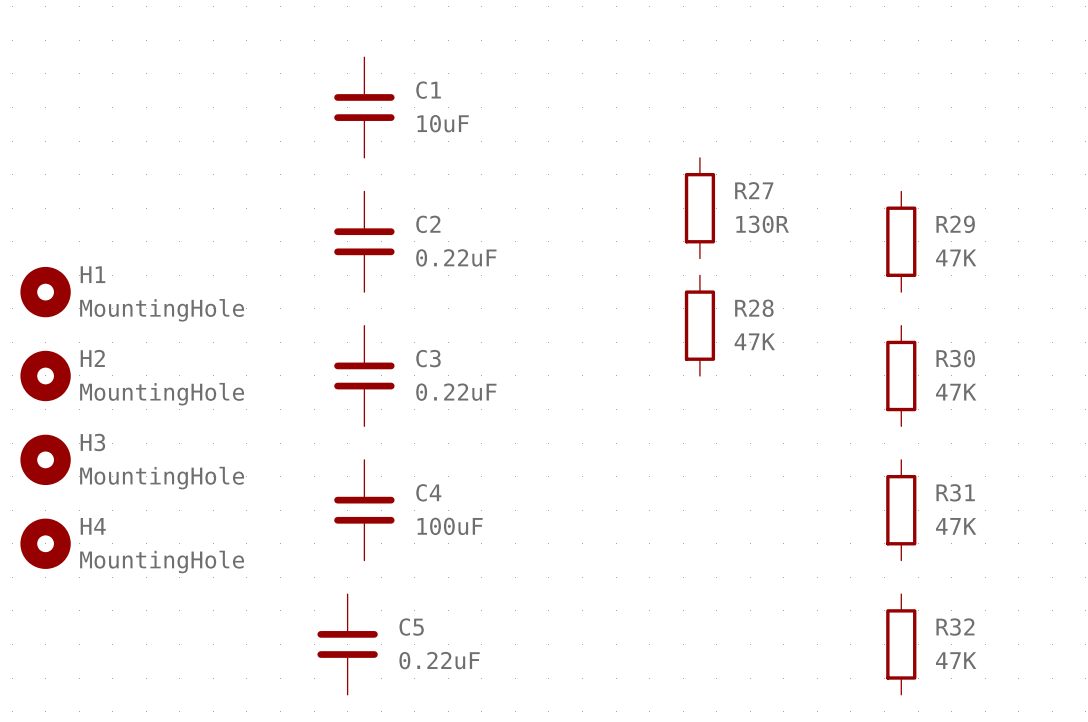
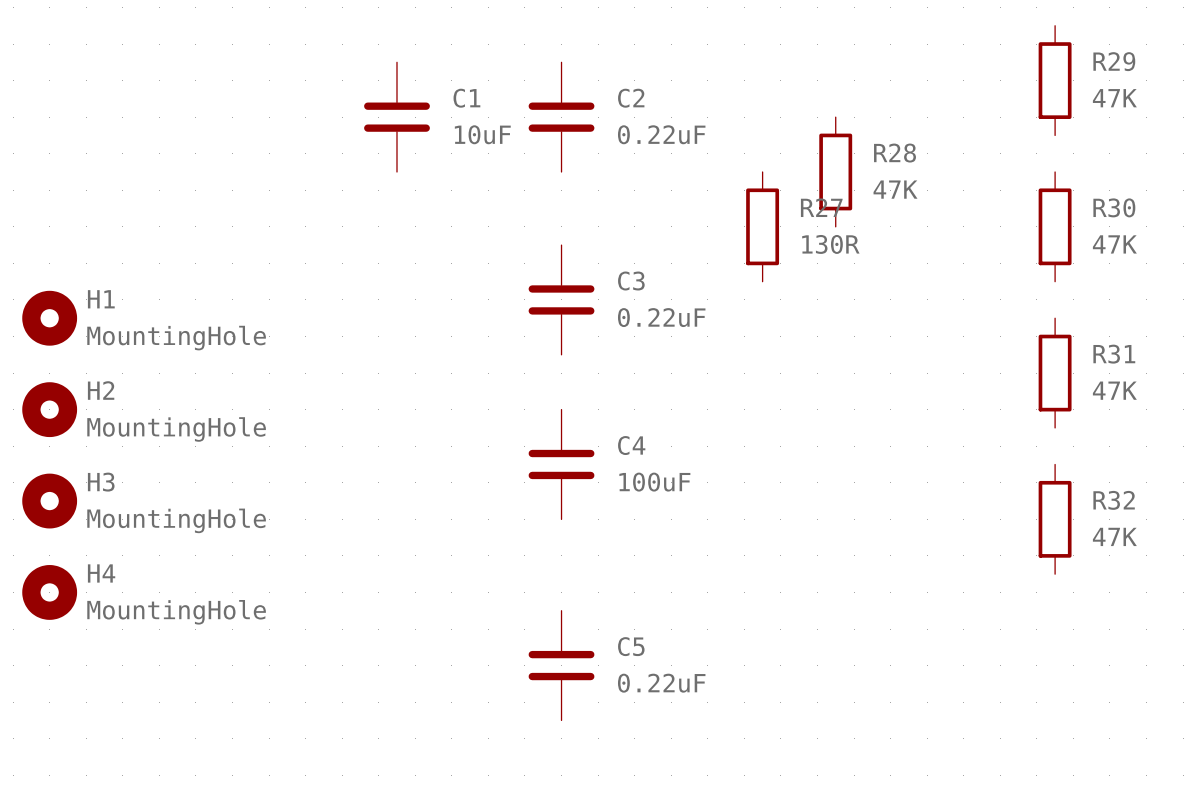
C2 position: (364, 241) -> (561, 117)
R29 position: (901, 241) -> (1055, 80)
R28 position: (699, 325) -> (835, 172)
C3 position: (364, 375) -> (561, 299)
R30 position: (901, 375) -> (1055, 226)
C4 position: (364, 510) -> (561, 464)
R31 position: (901, 510) -> (1055, 373)
C5 position: (347, 644) -> (561, 665)
R32 position: (901, 644) -> (1055, 519)

